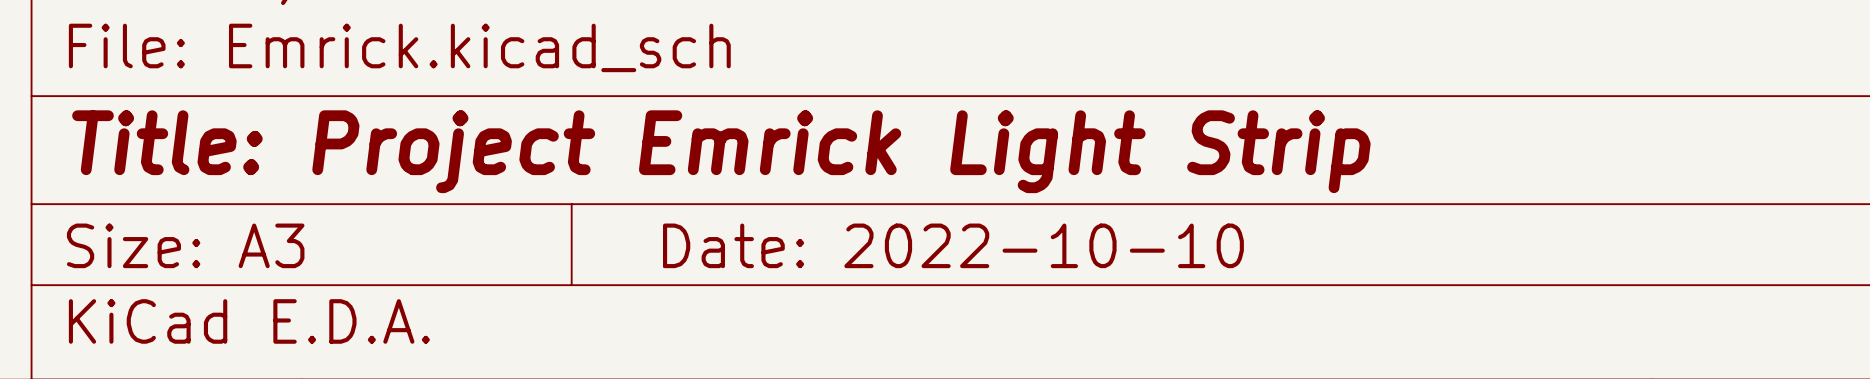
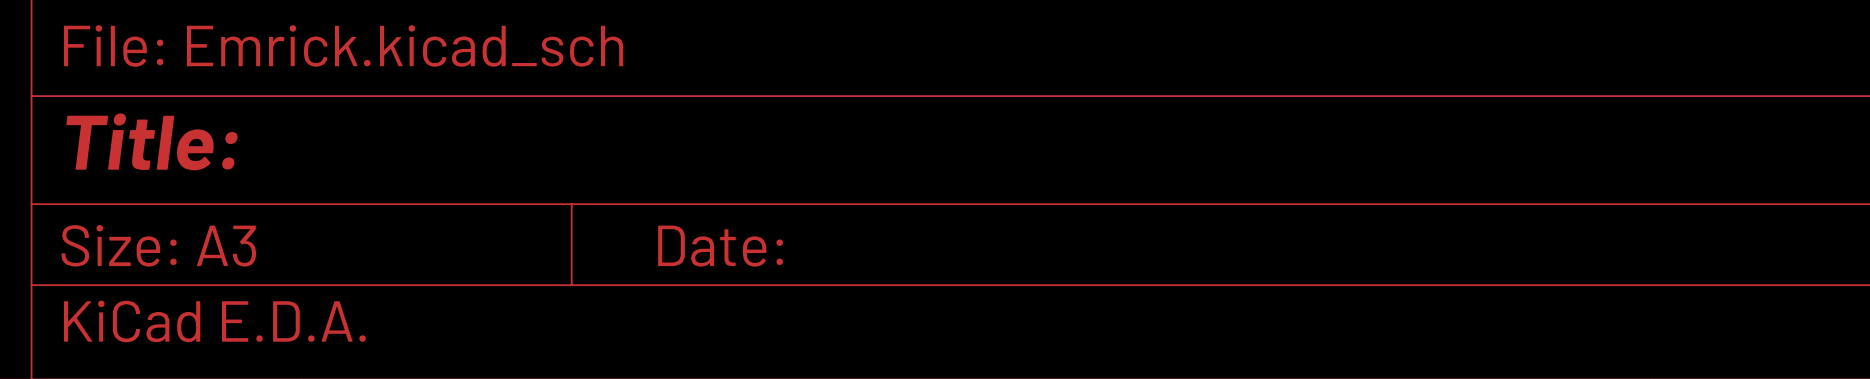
title block: Title: Project Emrick Light Strip (721, 151) -> Title: (152, 141)
title block: Date: 2022-10-10 (953, 245) -> Date: (720, 246)

